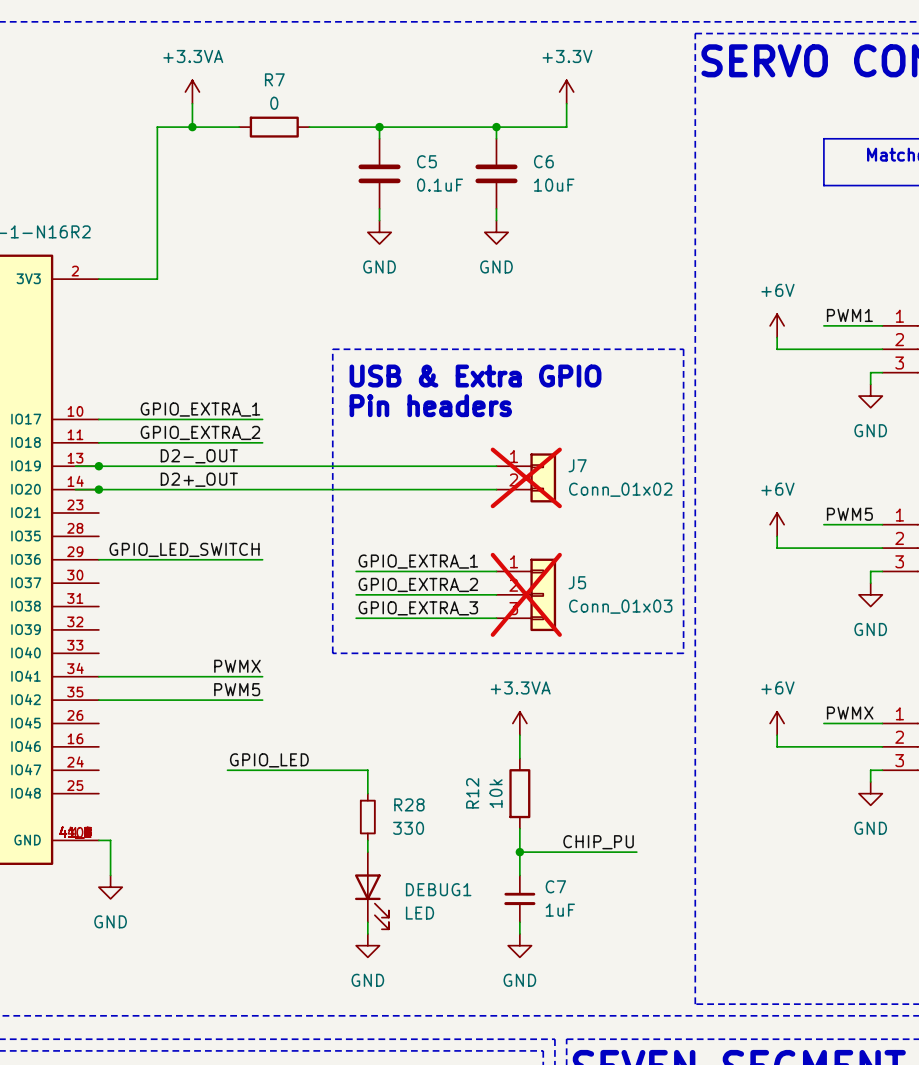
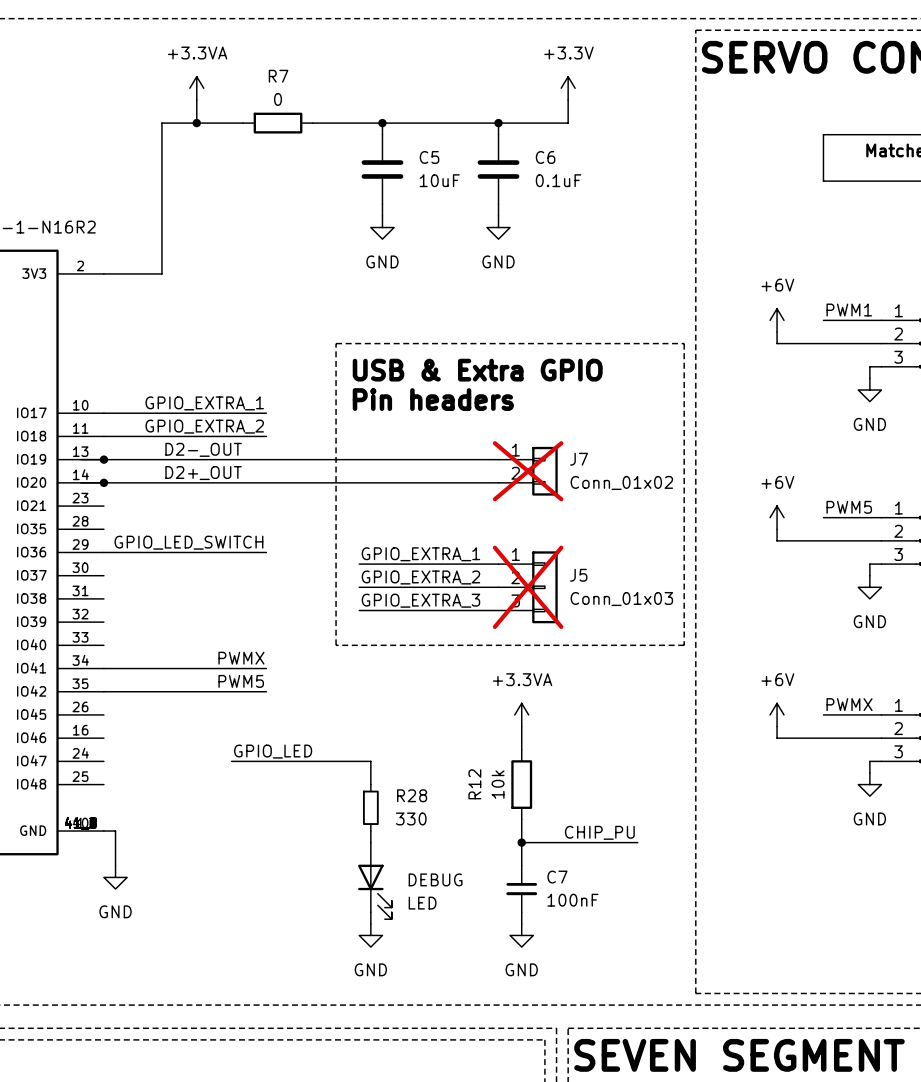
C5 value: 0.1uF (440, 185) -> 10uF (439, 180)
C6 value: 10uF (554, 185) -> 0.1uF (558, 180)
DEBUG1 name: DEBUG1 (438, 889) -> DEBUG (435, 879)
C7 value: 1uF (560, 910) -> 100nF (572, 900)

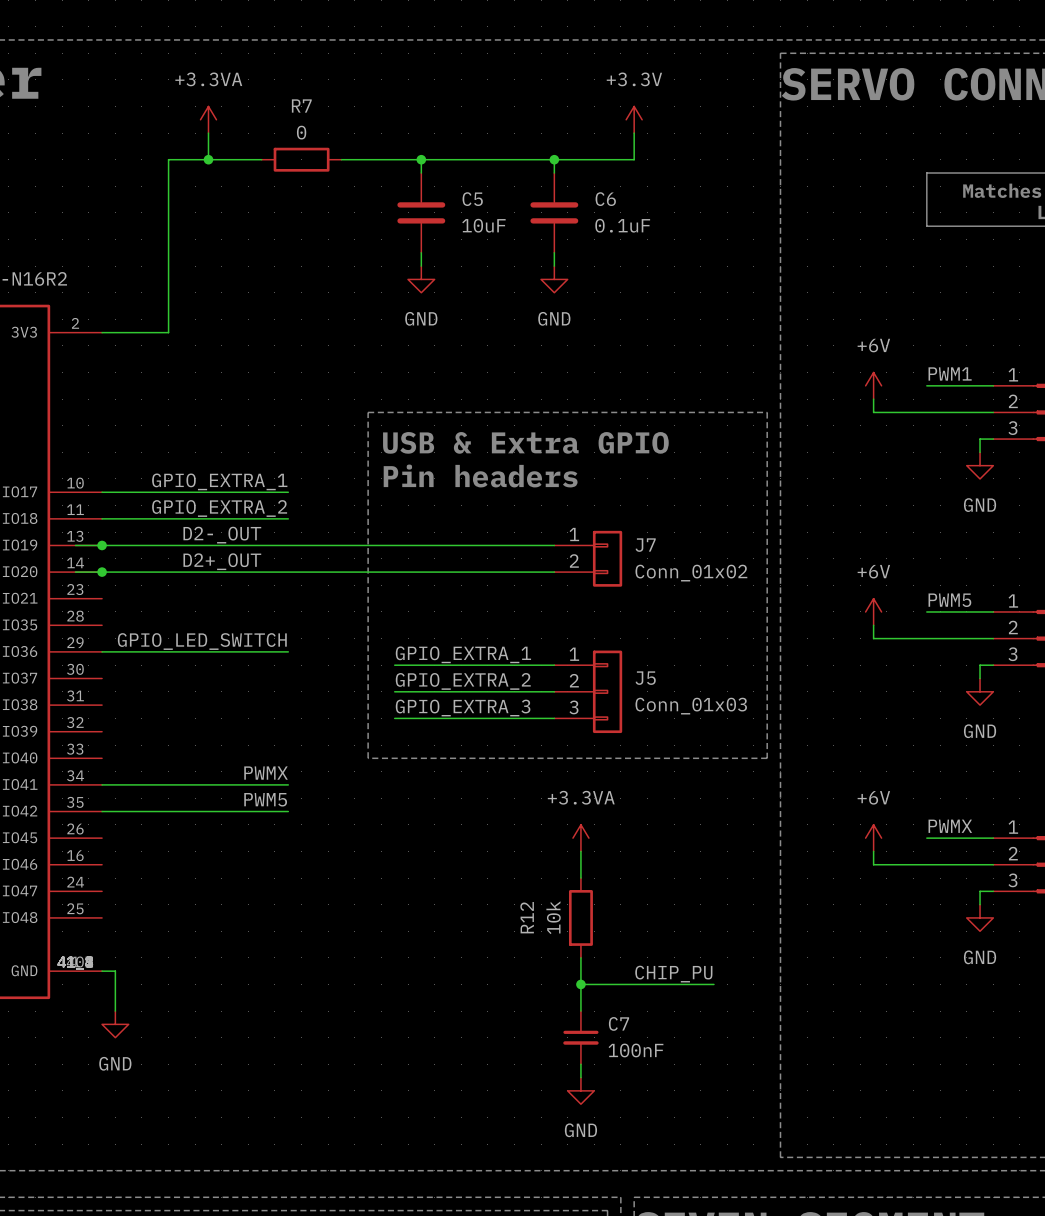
J7 do-not-place cross: (528, 471) -> none
J5 do-not-place cross: (528, 587) -> none
label: GPIO_LED (273, 751) -> none
wire: (231, 761) (370, 761) (370, 784) -> none
R28: 330 (370, 807) -> none
wire: (370, 831) (370, 842) -> none
DEBUG: LED (374, 880) -> none
wire: (370, 912) (370, 923) -> none
power symbol: GND (370, 935) -> none

